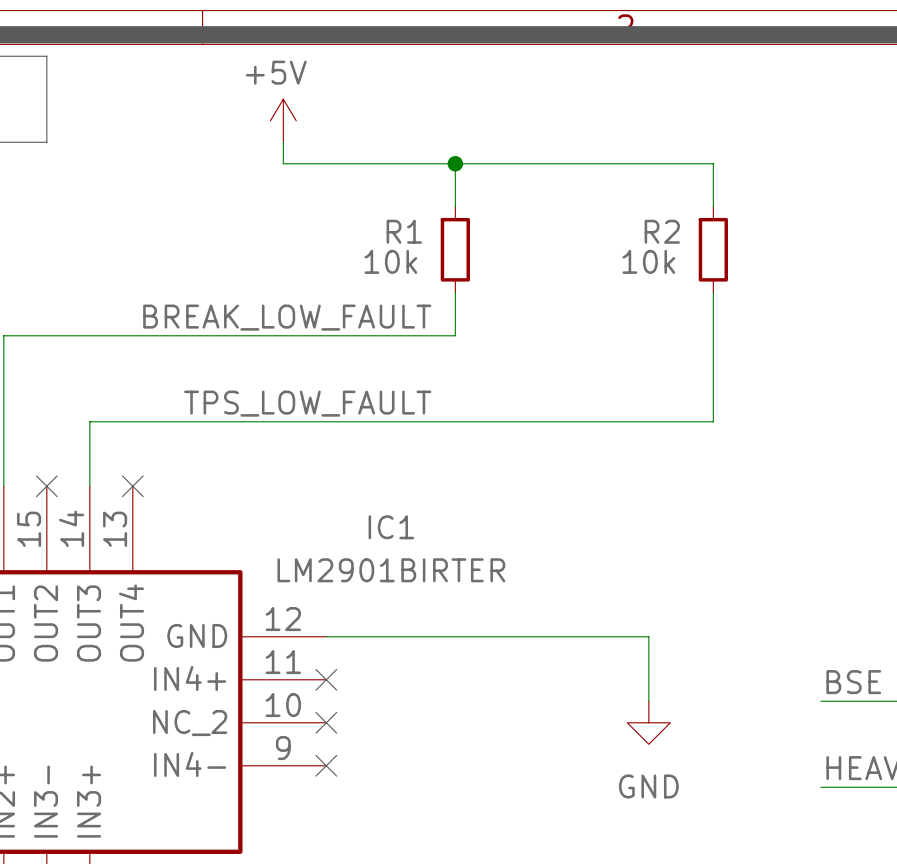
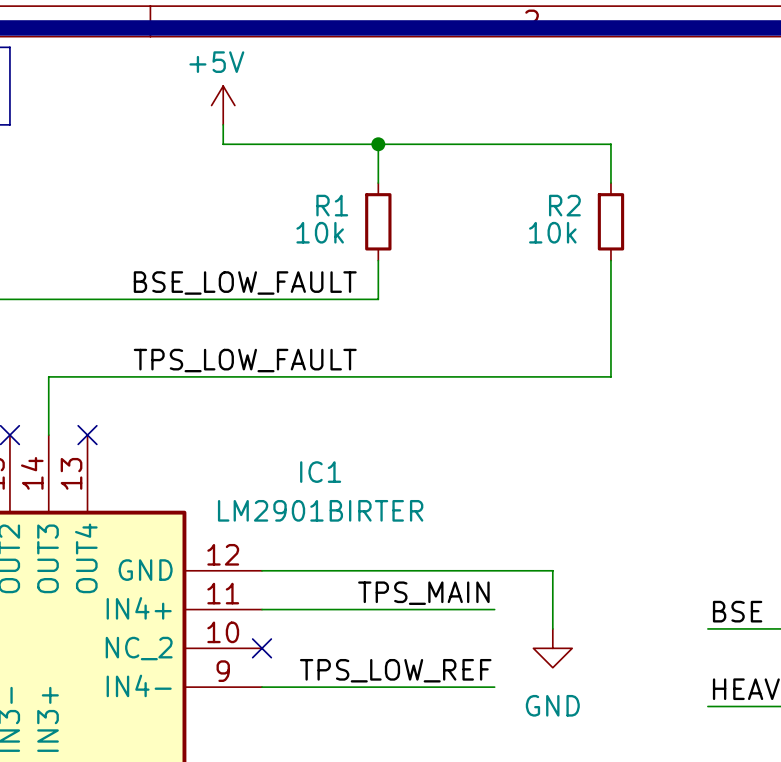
label: BREAK_LOW_FAULT (287, 317) -> BSE_LOW_FAULT (245, 282)
label: none -> TPS_MAIN (423, 593)
wire: none -> (262, 609) (494, 609)
no-connect mark: (326, 679) -> none
label: none -> TPS_LOW_REF (395, 670)
wire: none -> (262, 687) (494, 687)
no-connect mark: (326, 765) -> none

